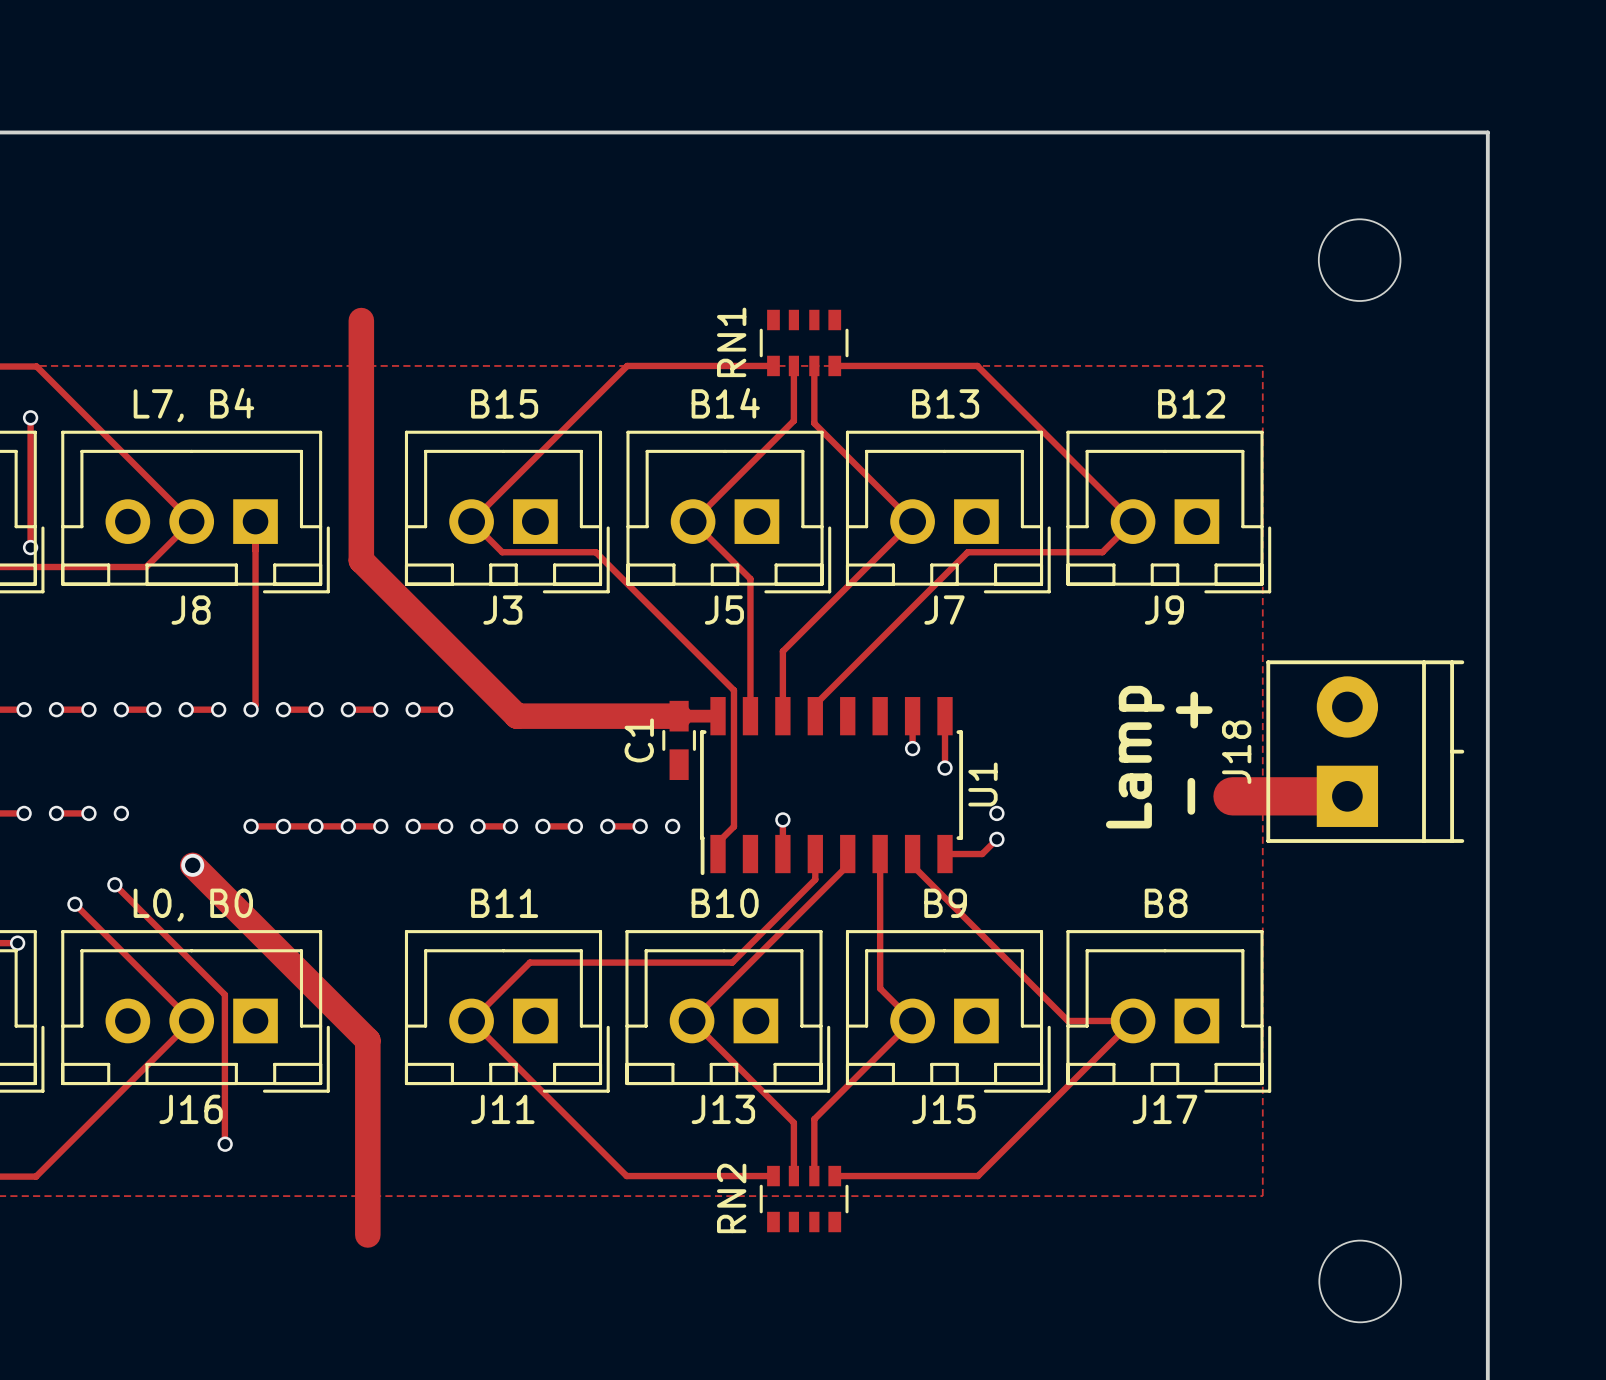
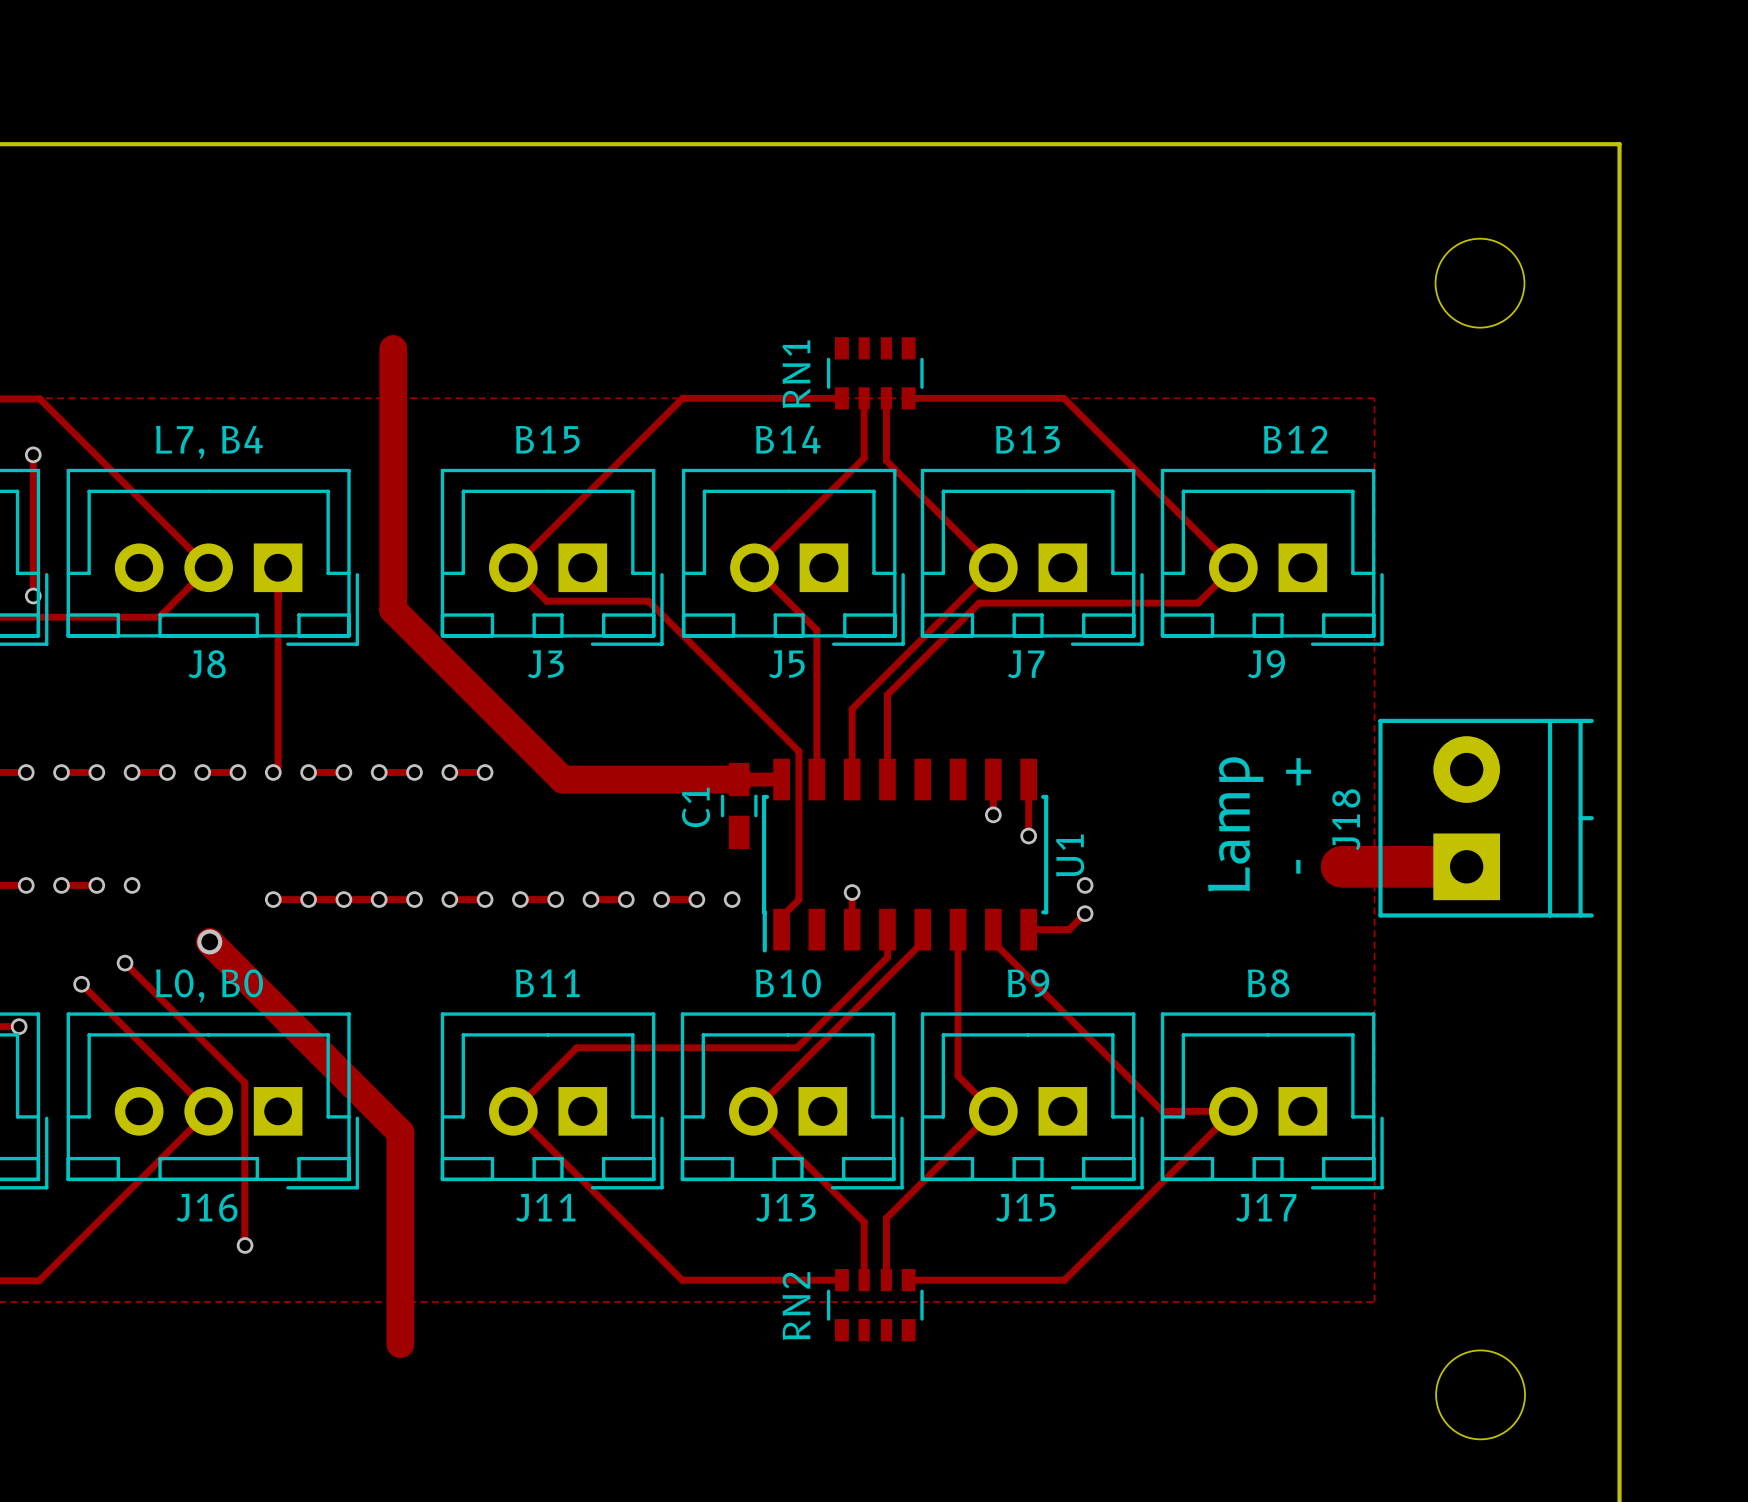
track: (1102, 552) (967, 552) (815, 704) -> (1200, 601) (1198, 603) (979, 603) (887, 694) (887, 767)

